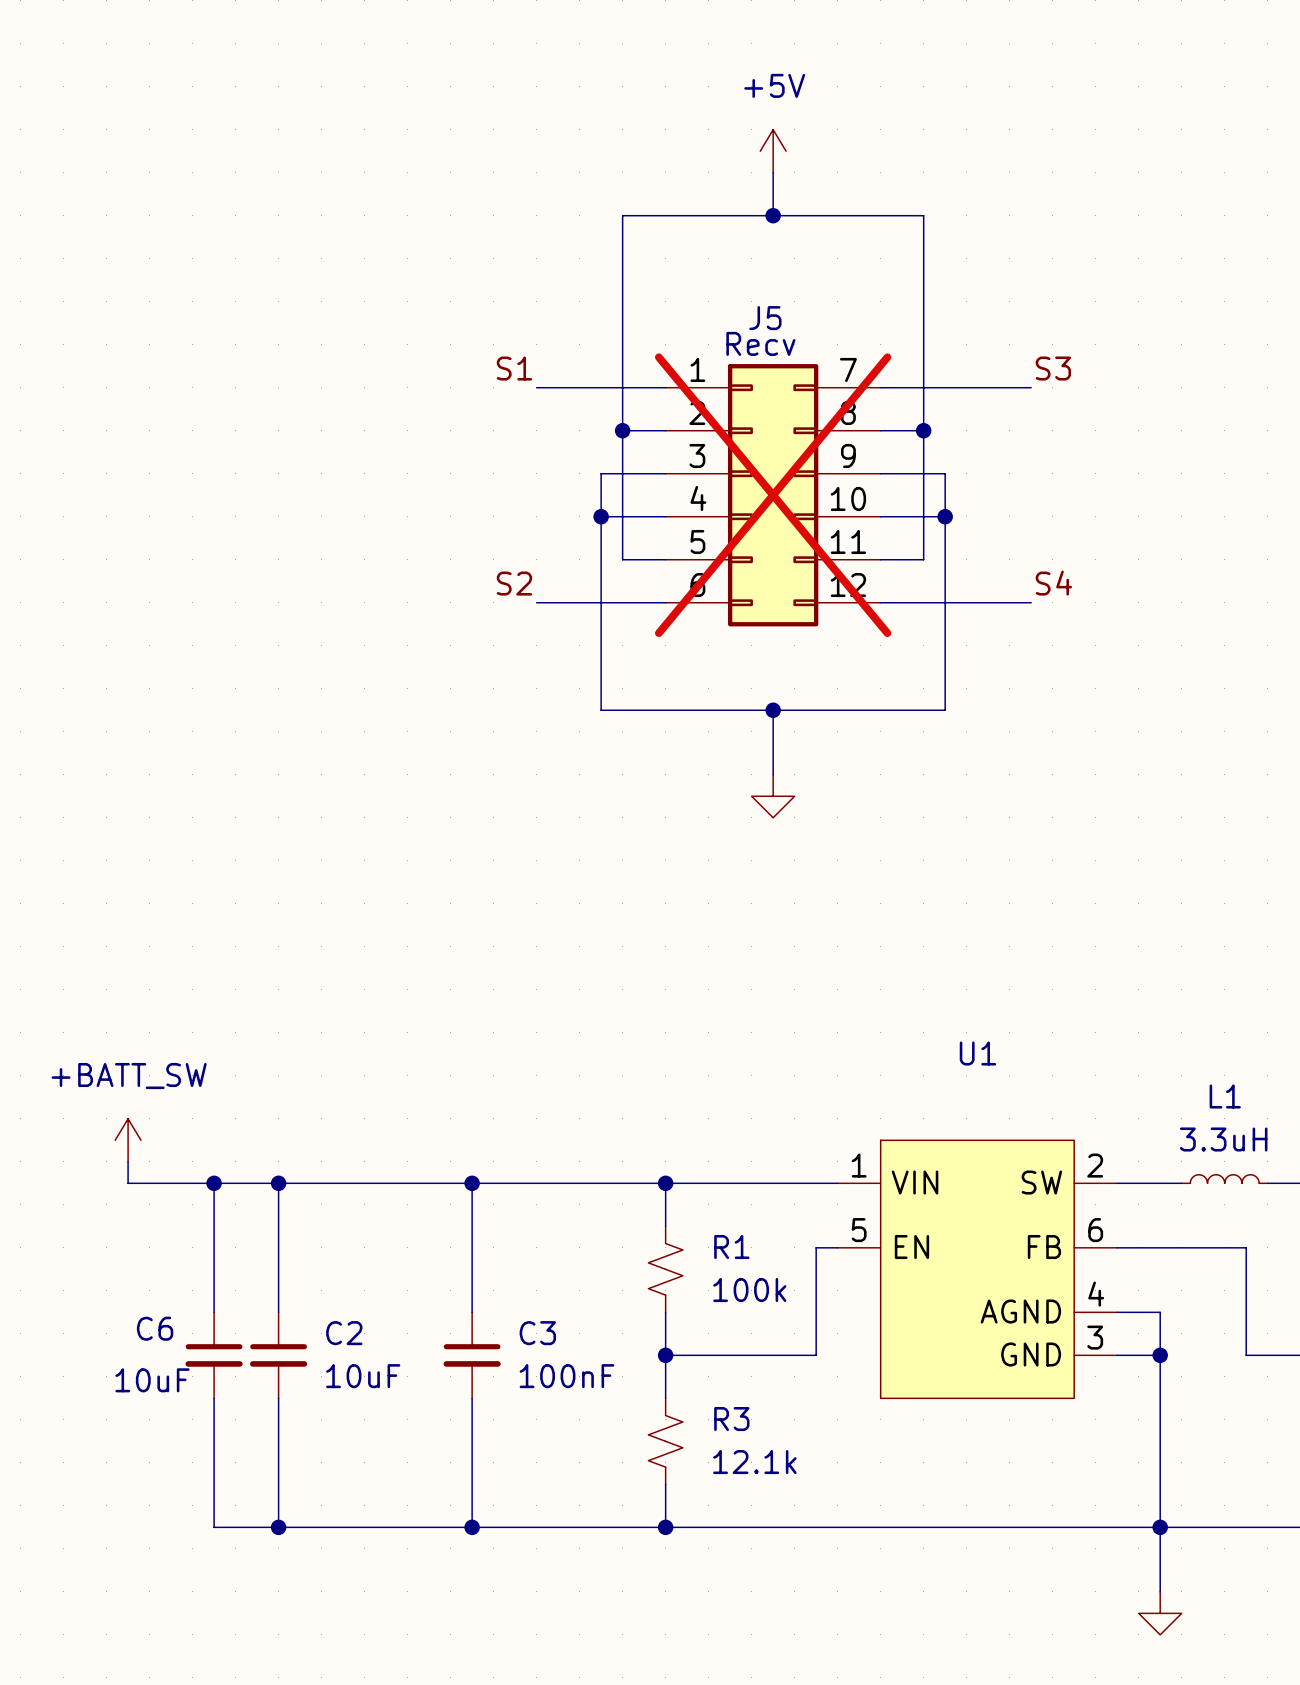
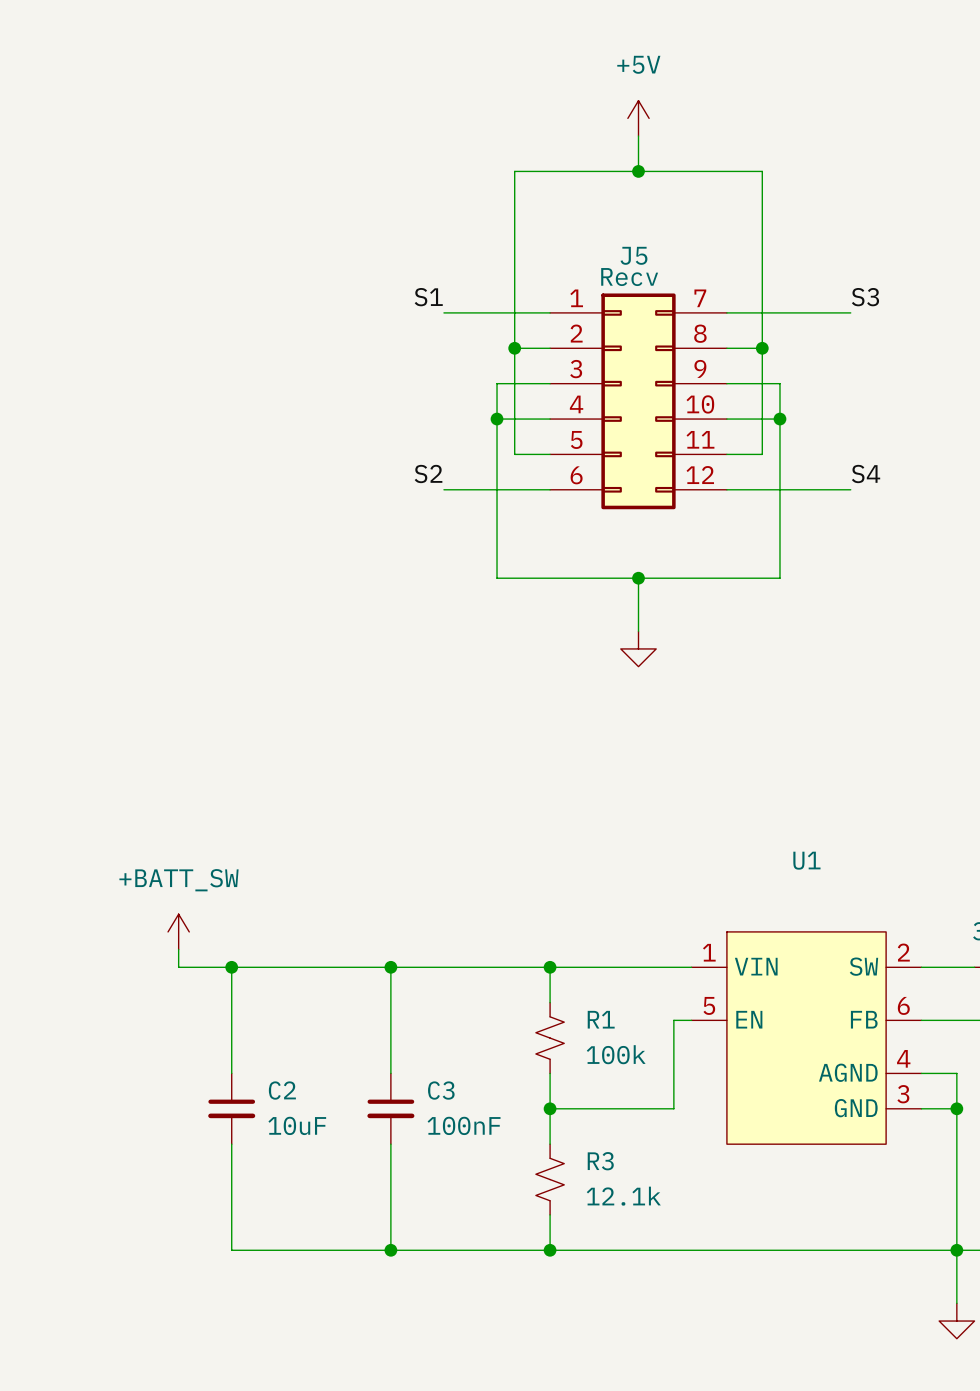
J5 do-not-place cross: (773, 495) -> none
power symbol position: +BATT_SW (128, 1140) -> +BATT_SW (178, 931)
wire: (128, 1161) (128, 1183) (214, 1183) (214, 1312) -> none
wire: none -> (178, 949) (178, 967)
junction: (214, 1183) -> none
C6: 10uF (214, 1355) -> none
wire: (214, 1398) (214, 1527) (278, 1527) -> none
junction: (278, 1527) -> none

